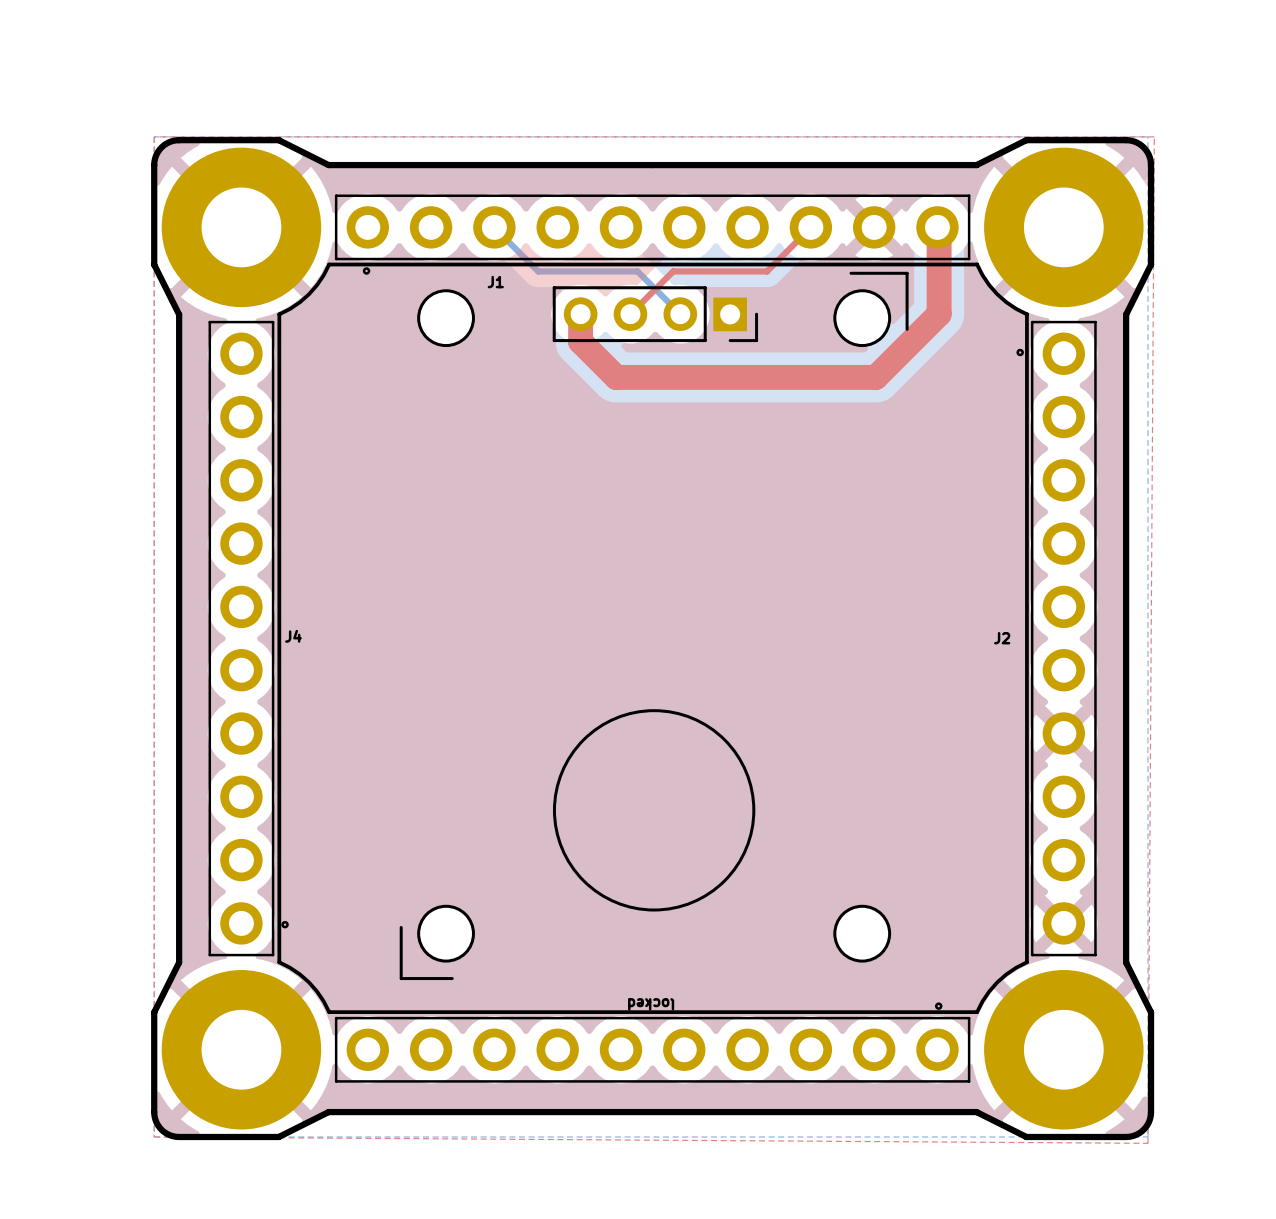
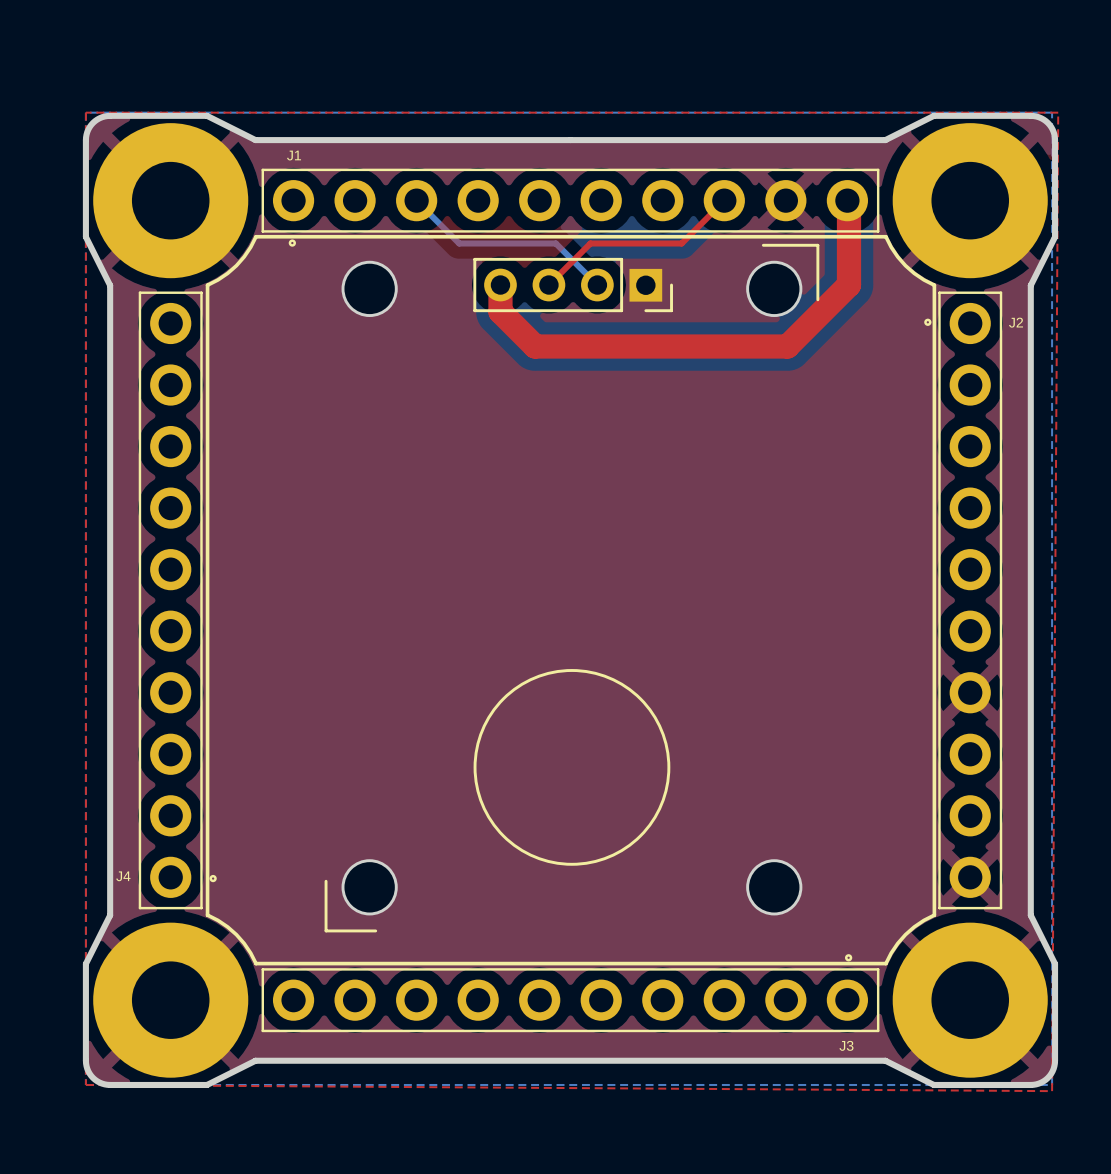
J1 name position: J1 (495, 282) -> J1 (294, 155)
J4 name position: J4 (293, 636) -> J4 (123, 876)
J2 name position: J2 (1002, 638) -> J2 (1016, 322)
locked name: locked (651, 1004) -> J3 (846, 1045)

